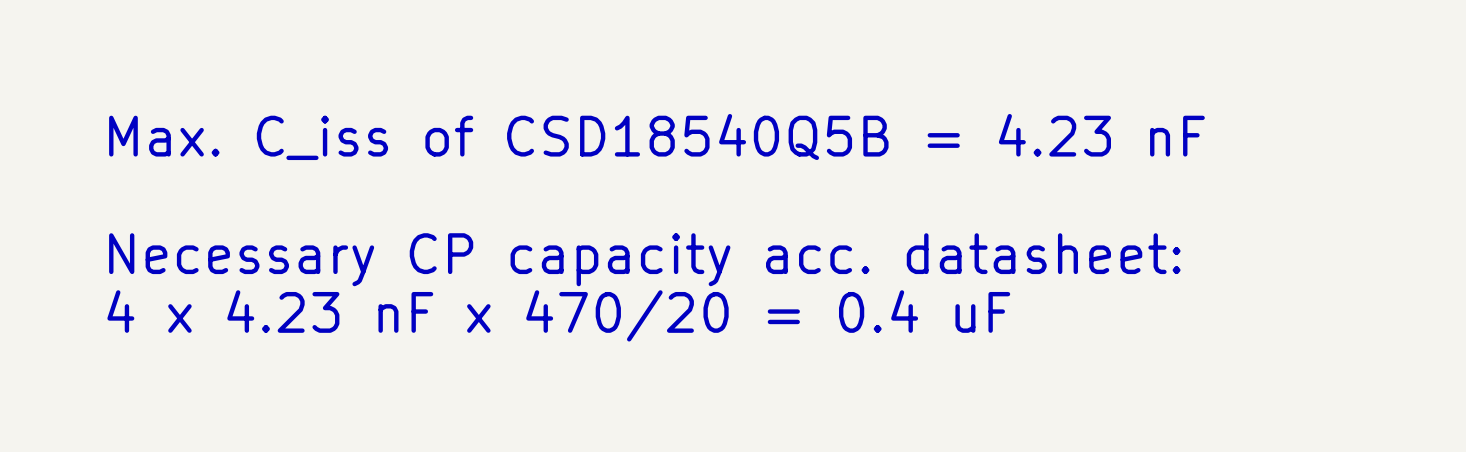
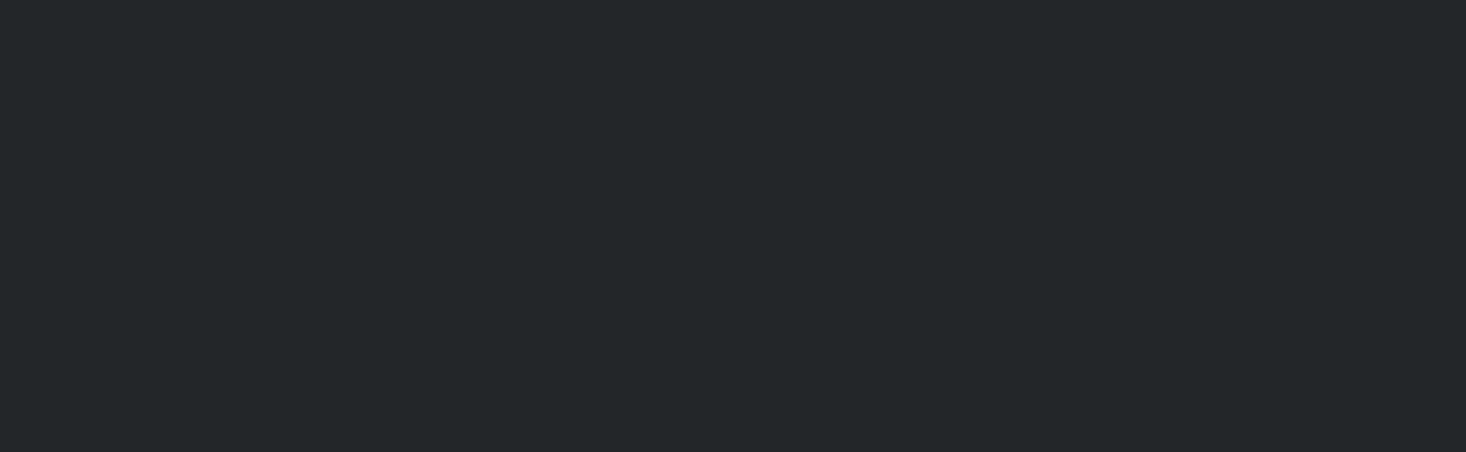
text: Max. C_iss of CSD18540Q5B = 4.23 nF (656, 137) -> none
text: Necessary CP capacity acc. datasheet: (644, 259) -> none
text: 4 x 4.23 nF x 470/20 = 0.4 uF (558, 315) -> none

